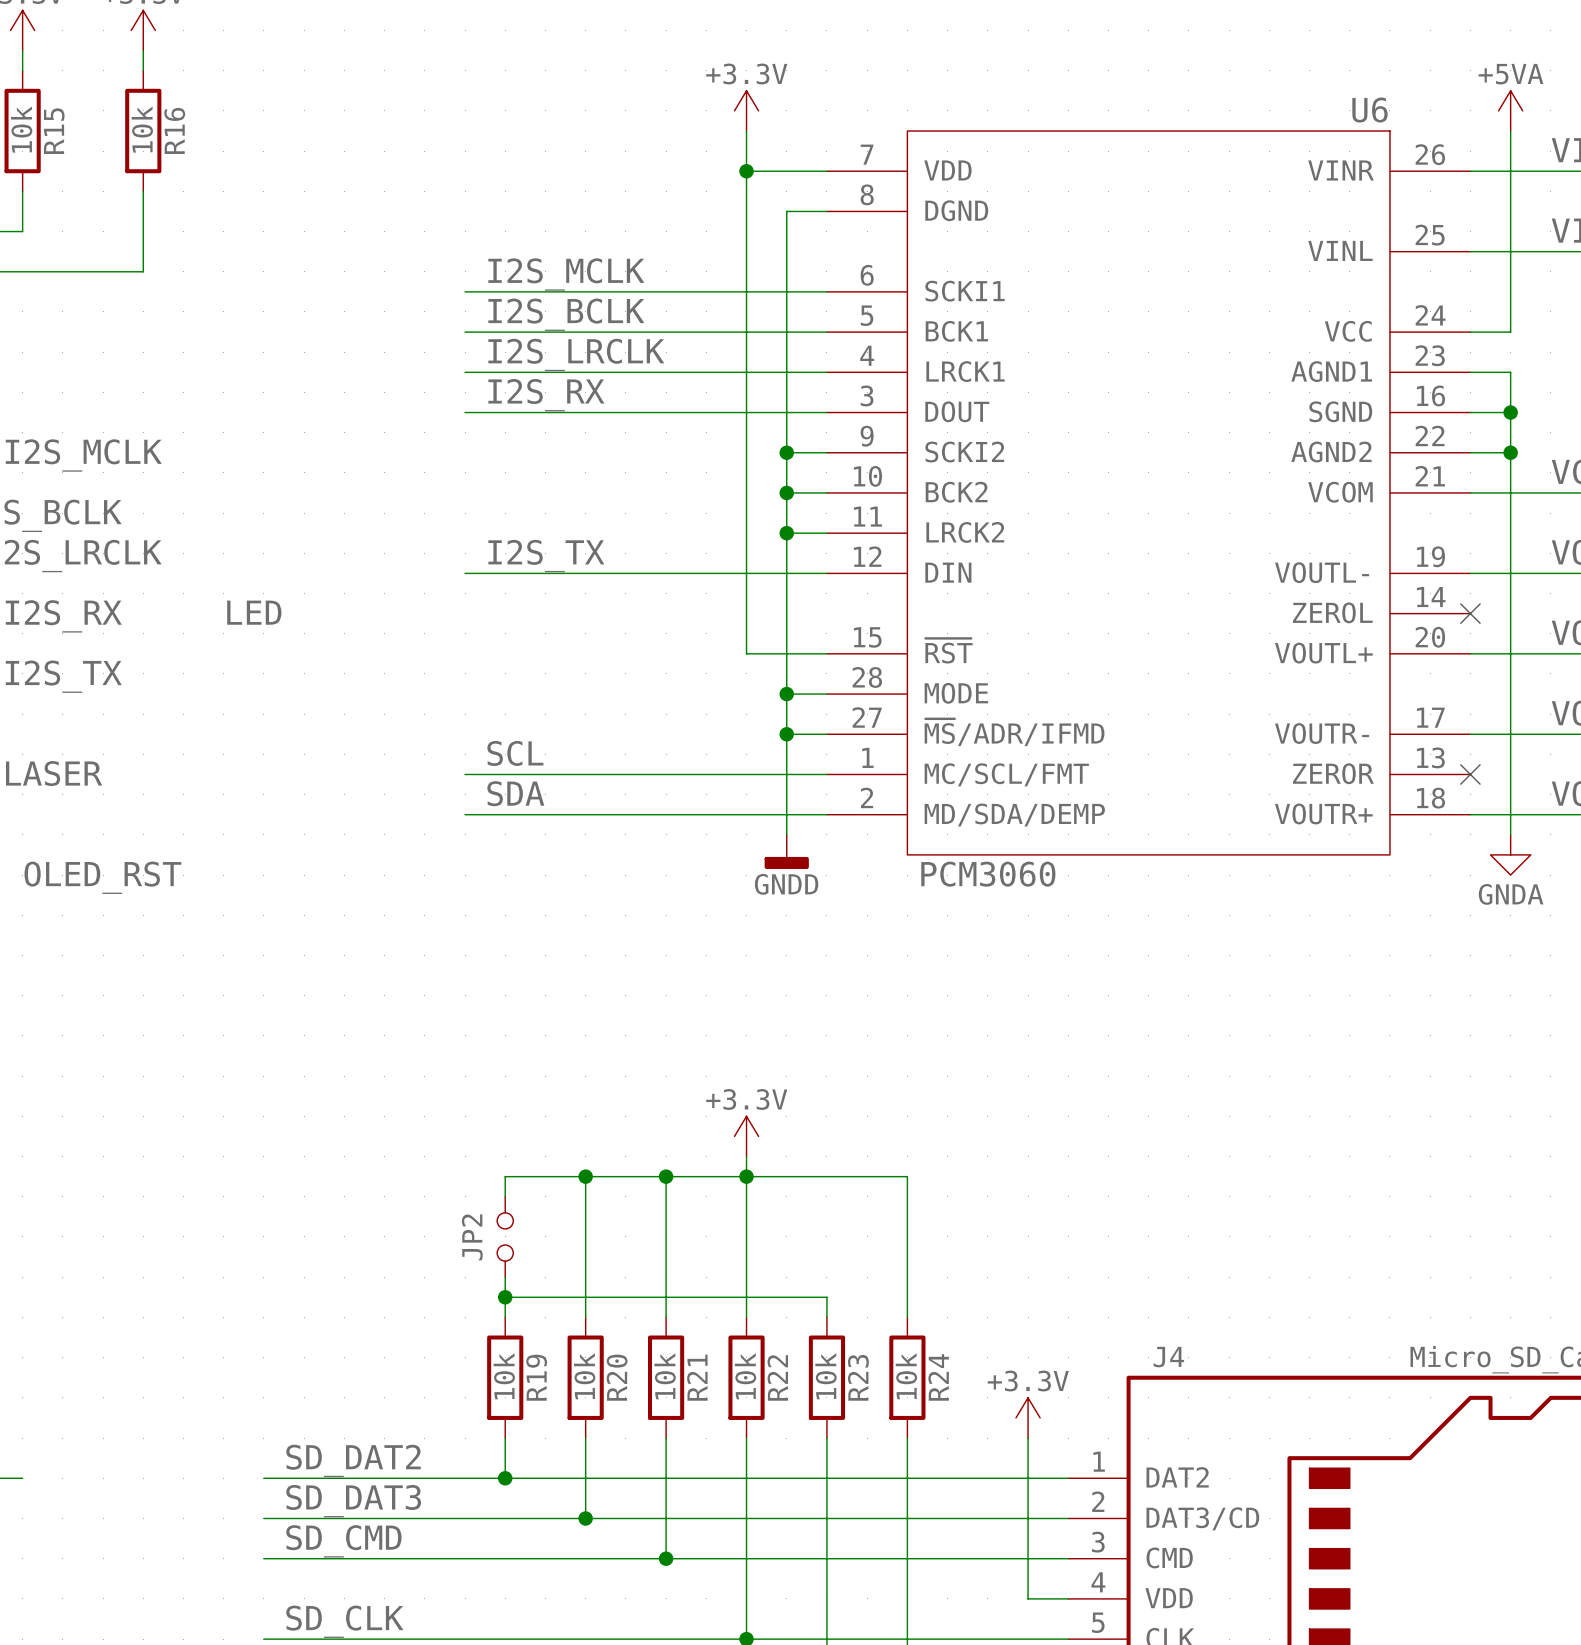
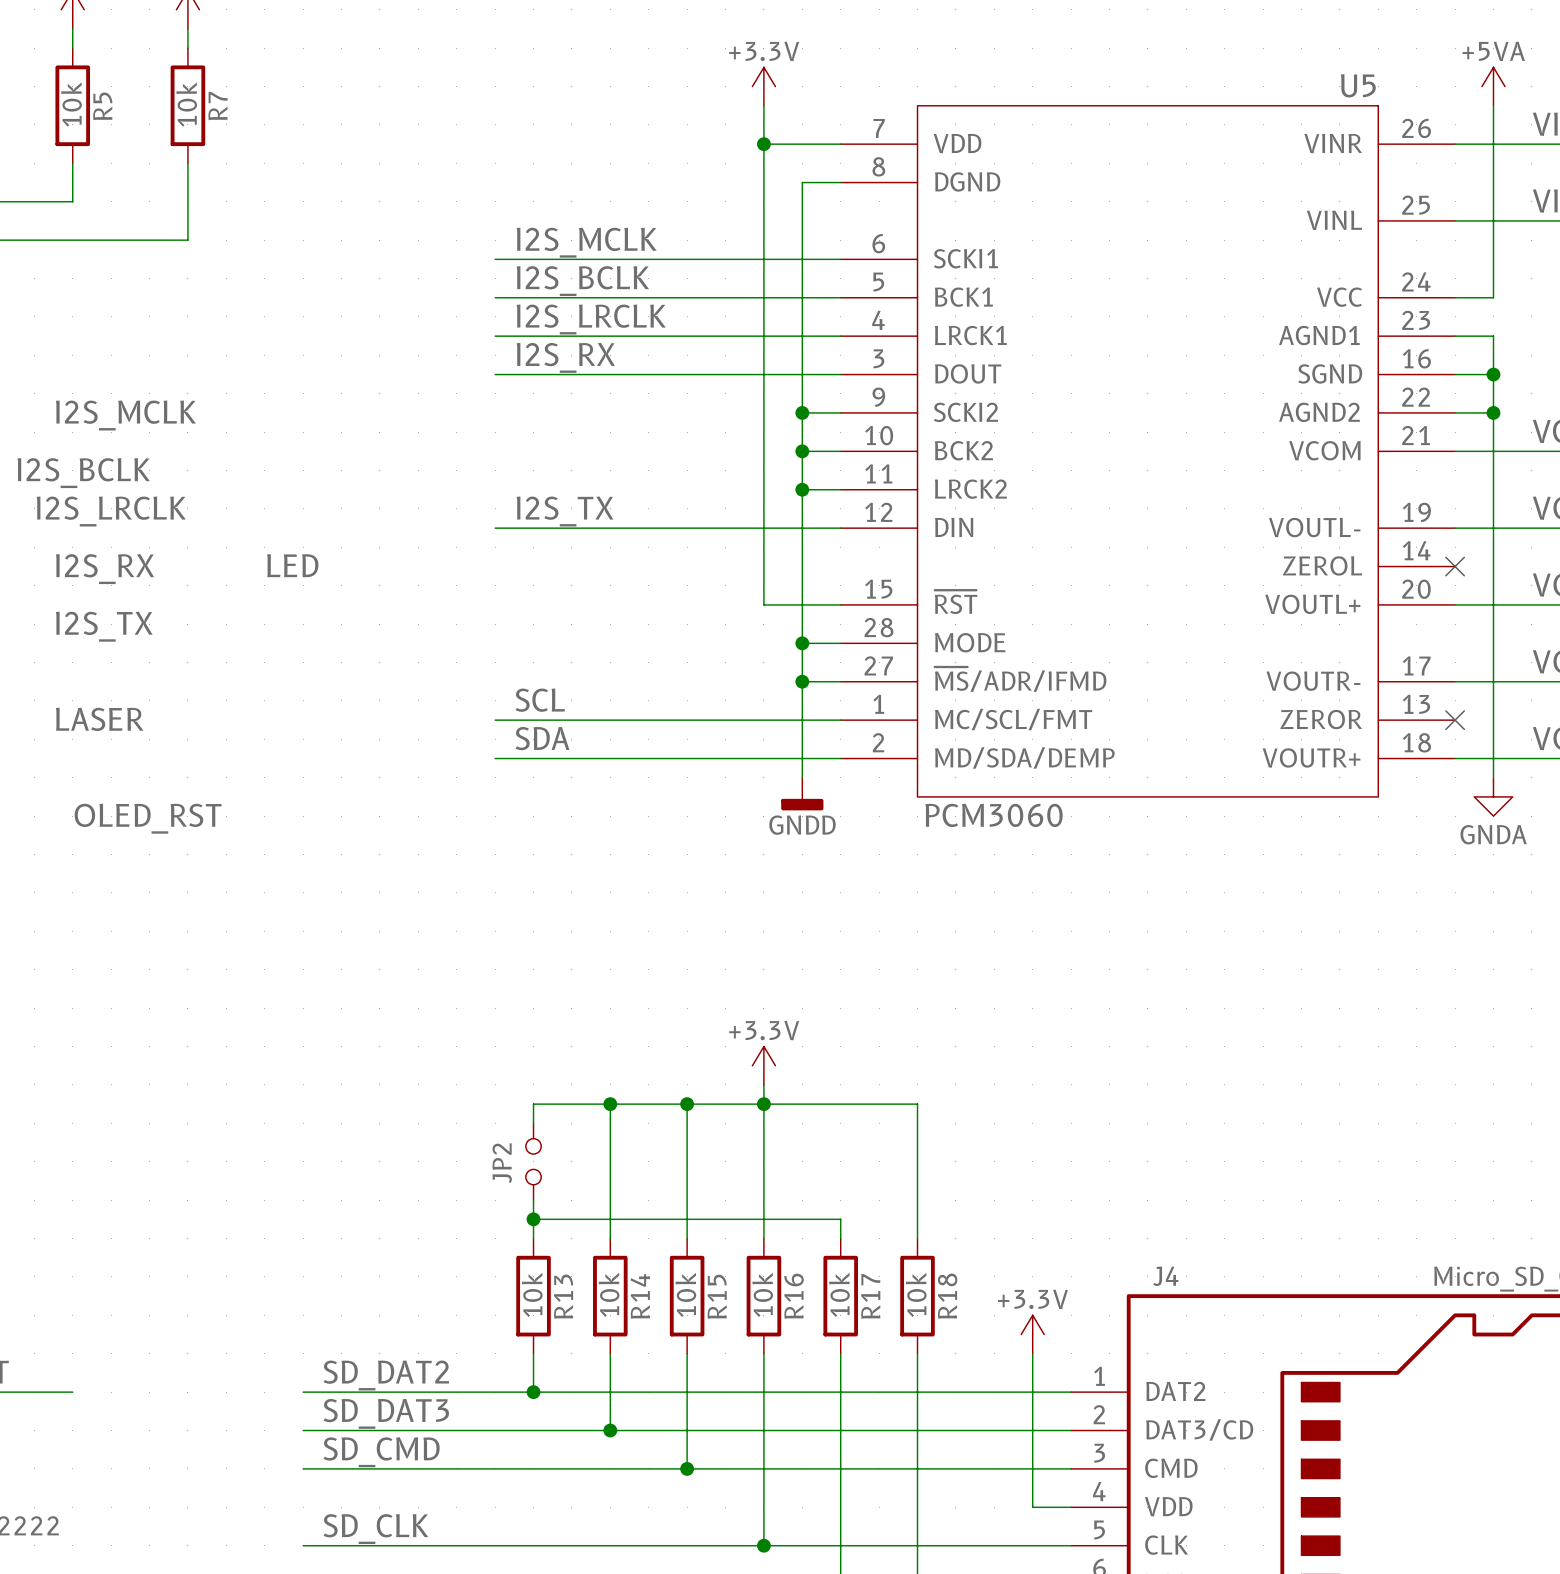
U6 name: U6 (1370, 110) -> U5 (1358, 85)
R16 name: R16 (174, 130) -> R7 (217, 106)
R15 name: R15 (54, 131) -> R5 (102, 106)
R19 name: R19 (536, 1377) -> R13 (563, 1296)
R20 name: R20 (617, 1377) -> R14 (640, 1296)
R21 name: R21 (697, 1377) -> R15 (717, 1296)
R22 name: R22 (777, 1377) -> R16 (794, 1296)
R23 name: R23 (858, 1377) -> R17 (870, 1296)
R24 name: R24 (938, 1377) -> R18 (947, 1296)

